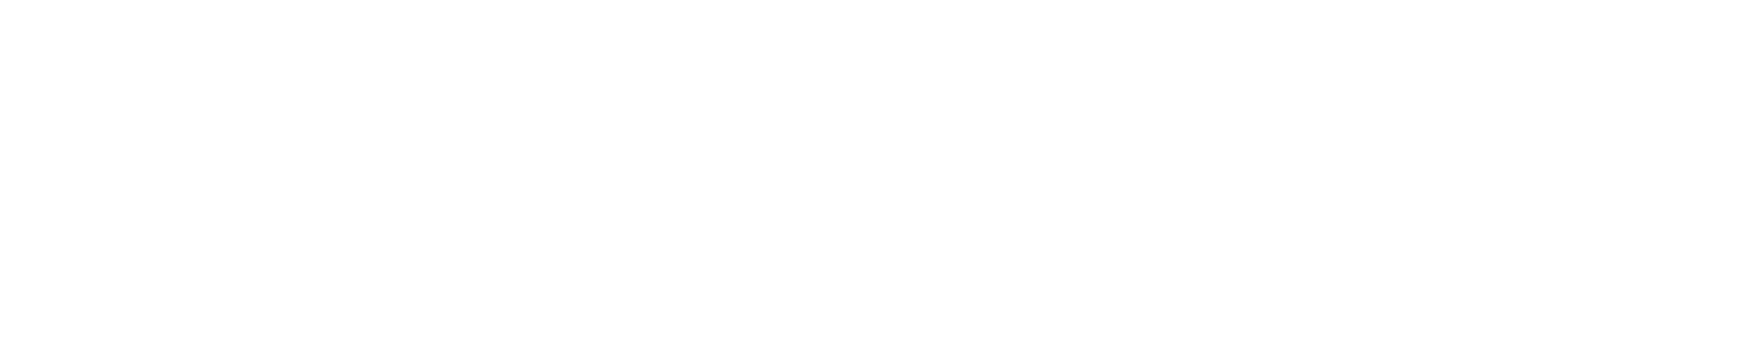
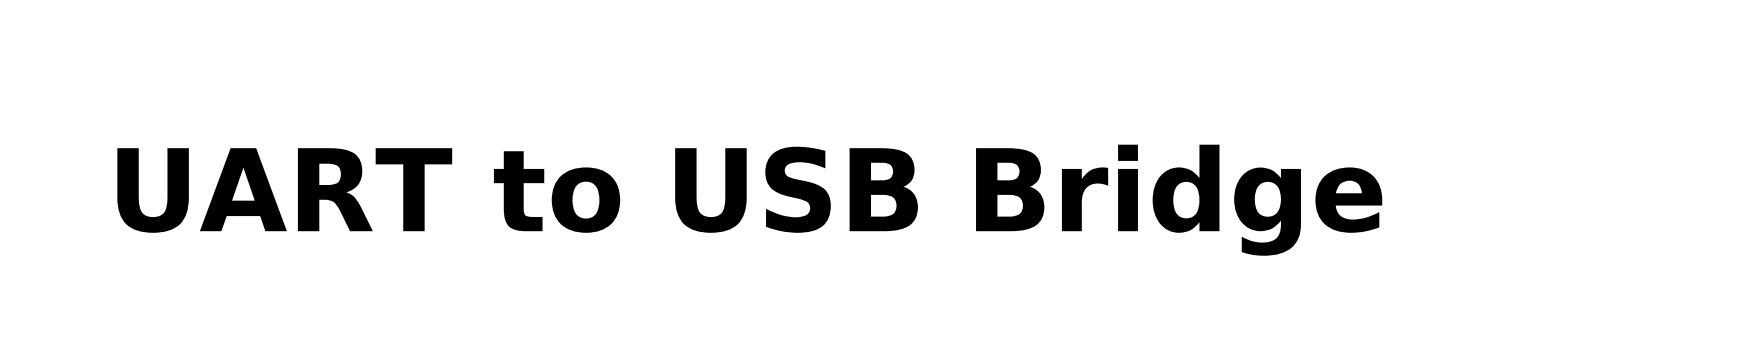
text: none -> UART to USB Bridge (749, 200)

